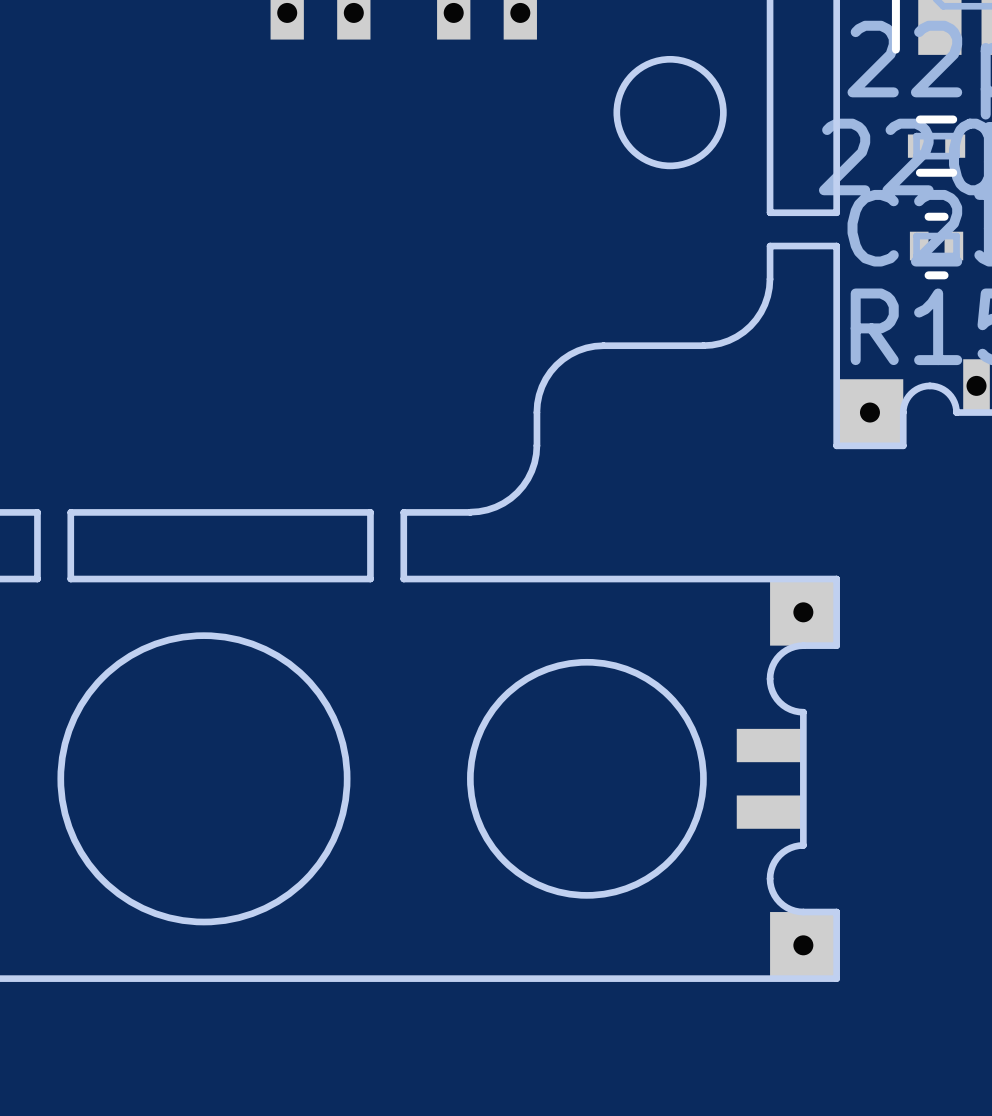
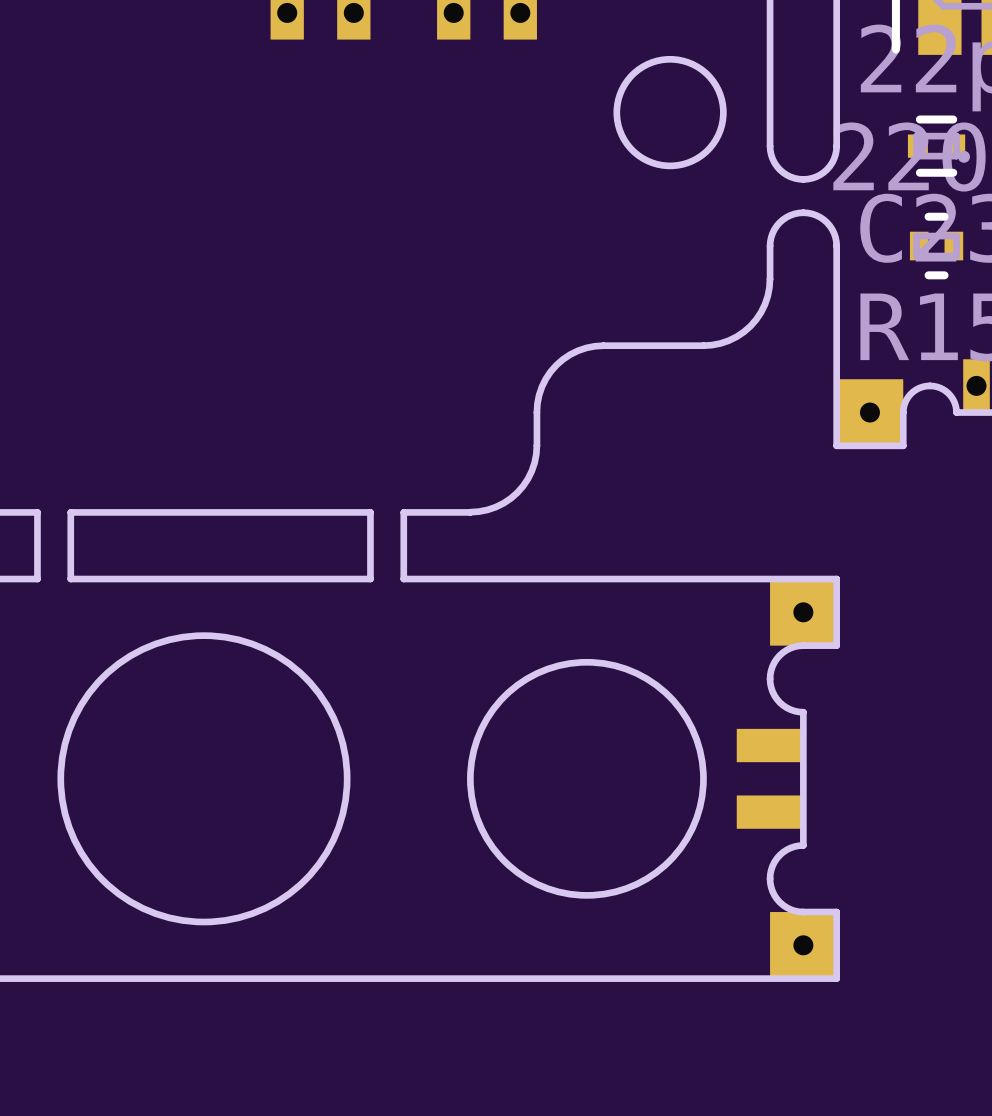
board edge: (836, 146) (836, 212) (770, 212) (770, 146) -> (836, 146) (834, 158) (826, 169) (816, 176) (803, 179) (790, 176) (779, 169) (772, 158) (770, 146)
board edge: (836, 246) (770, 246) -> (836, 246) (834, 233) (826, 222) (816, 215) (803, 212) (790, 215) (779, 222) (772, 233) (770, 246)

